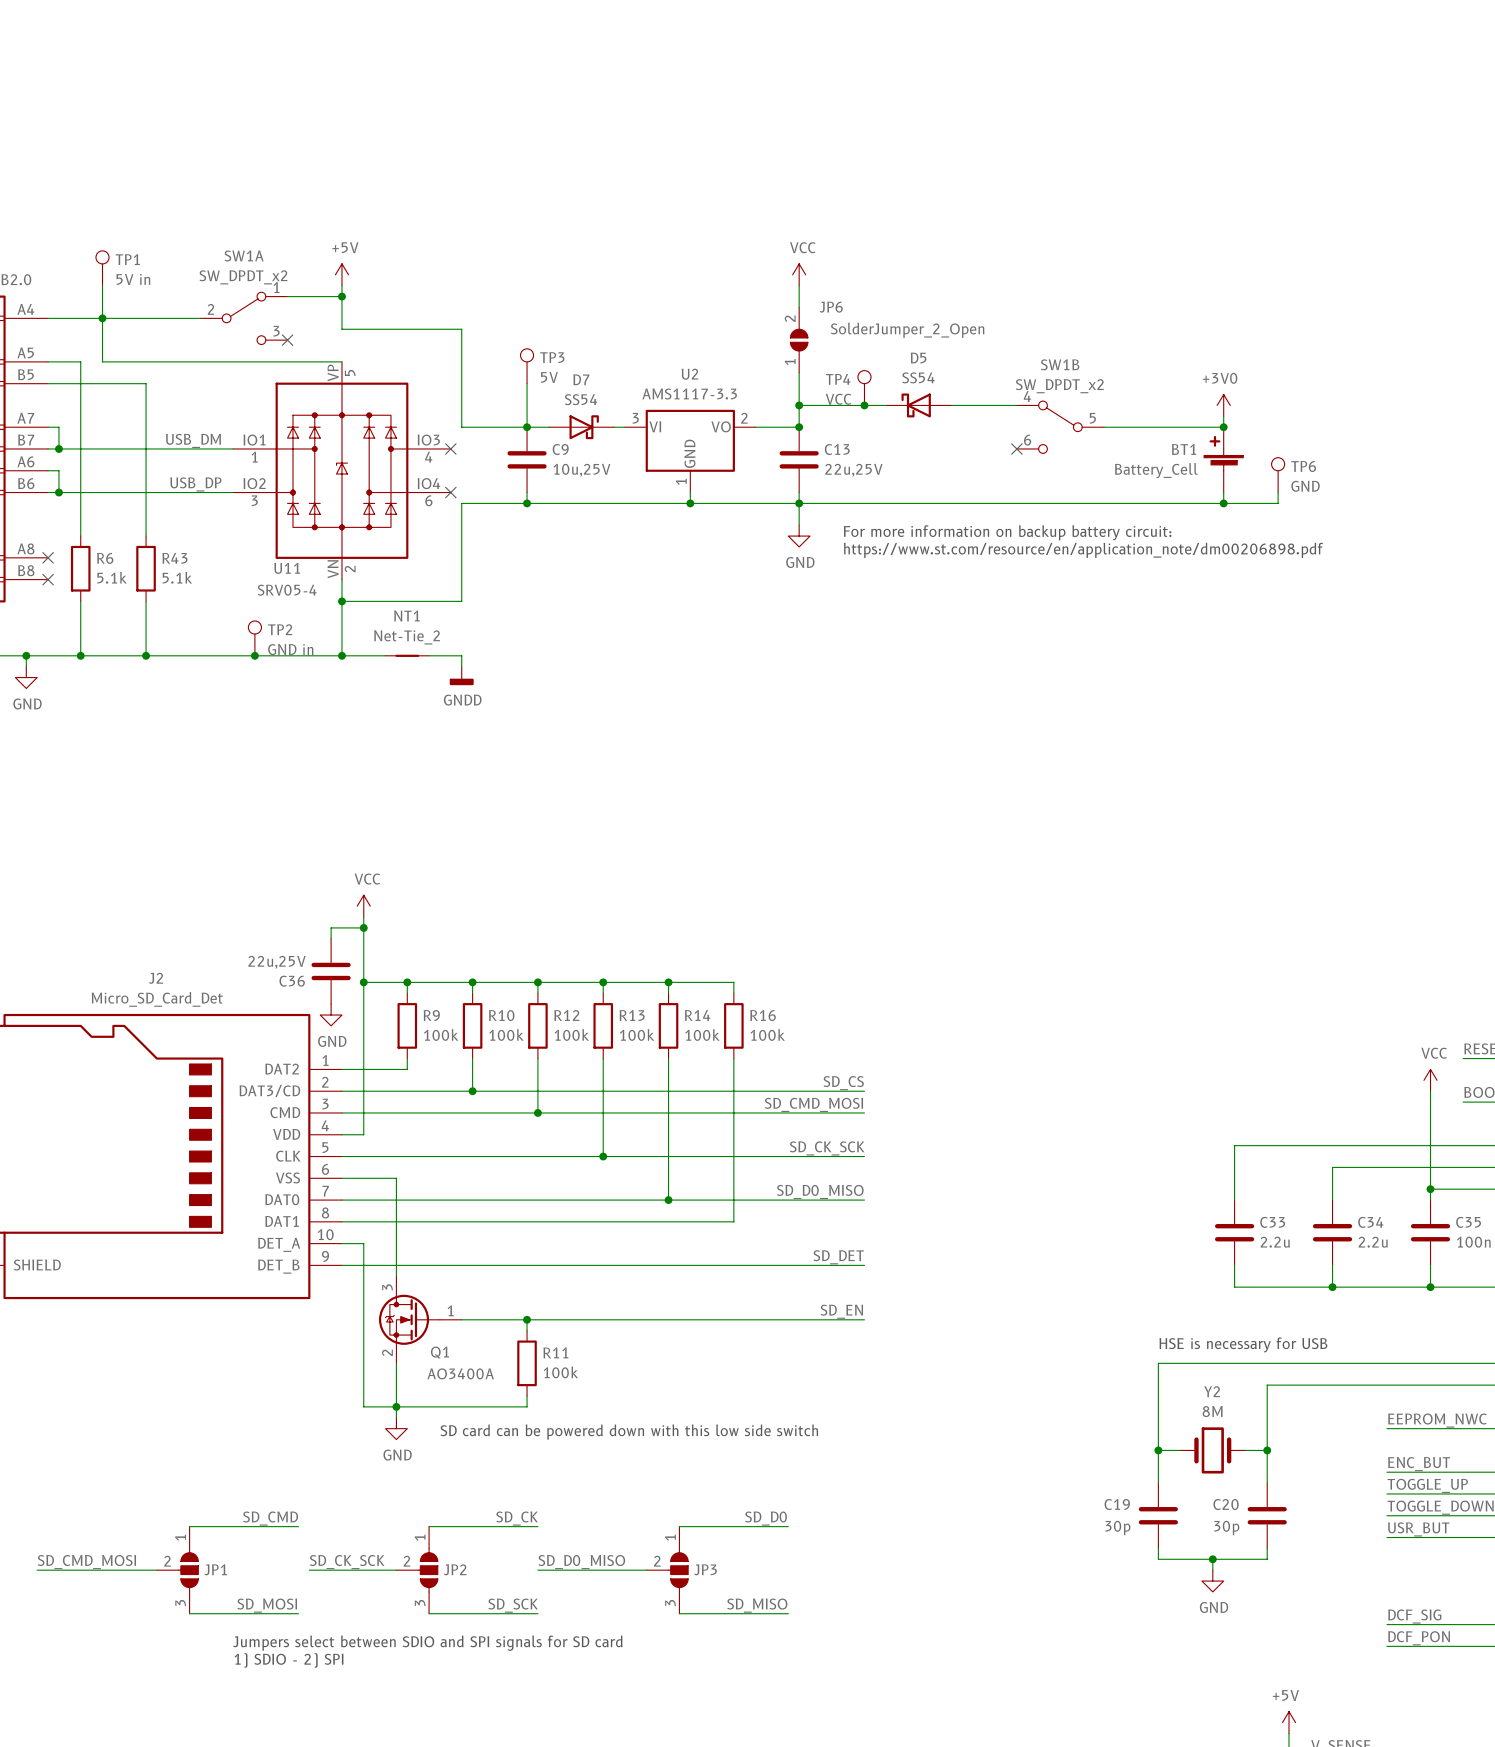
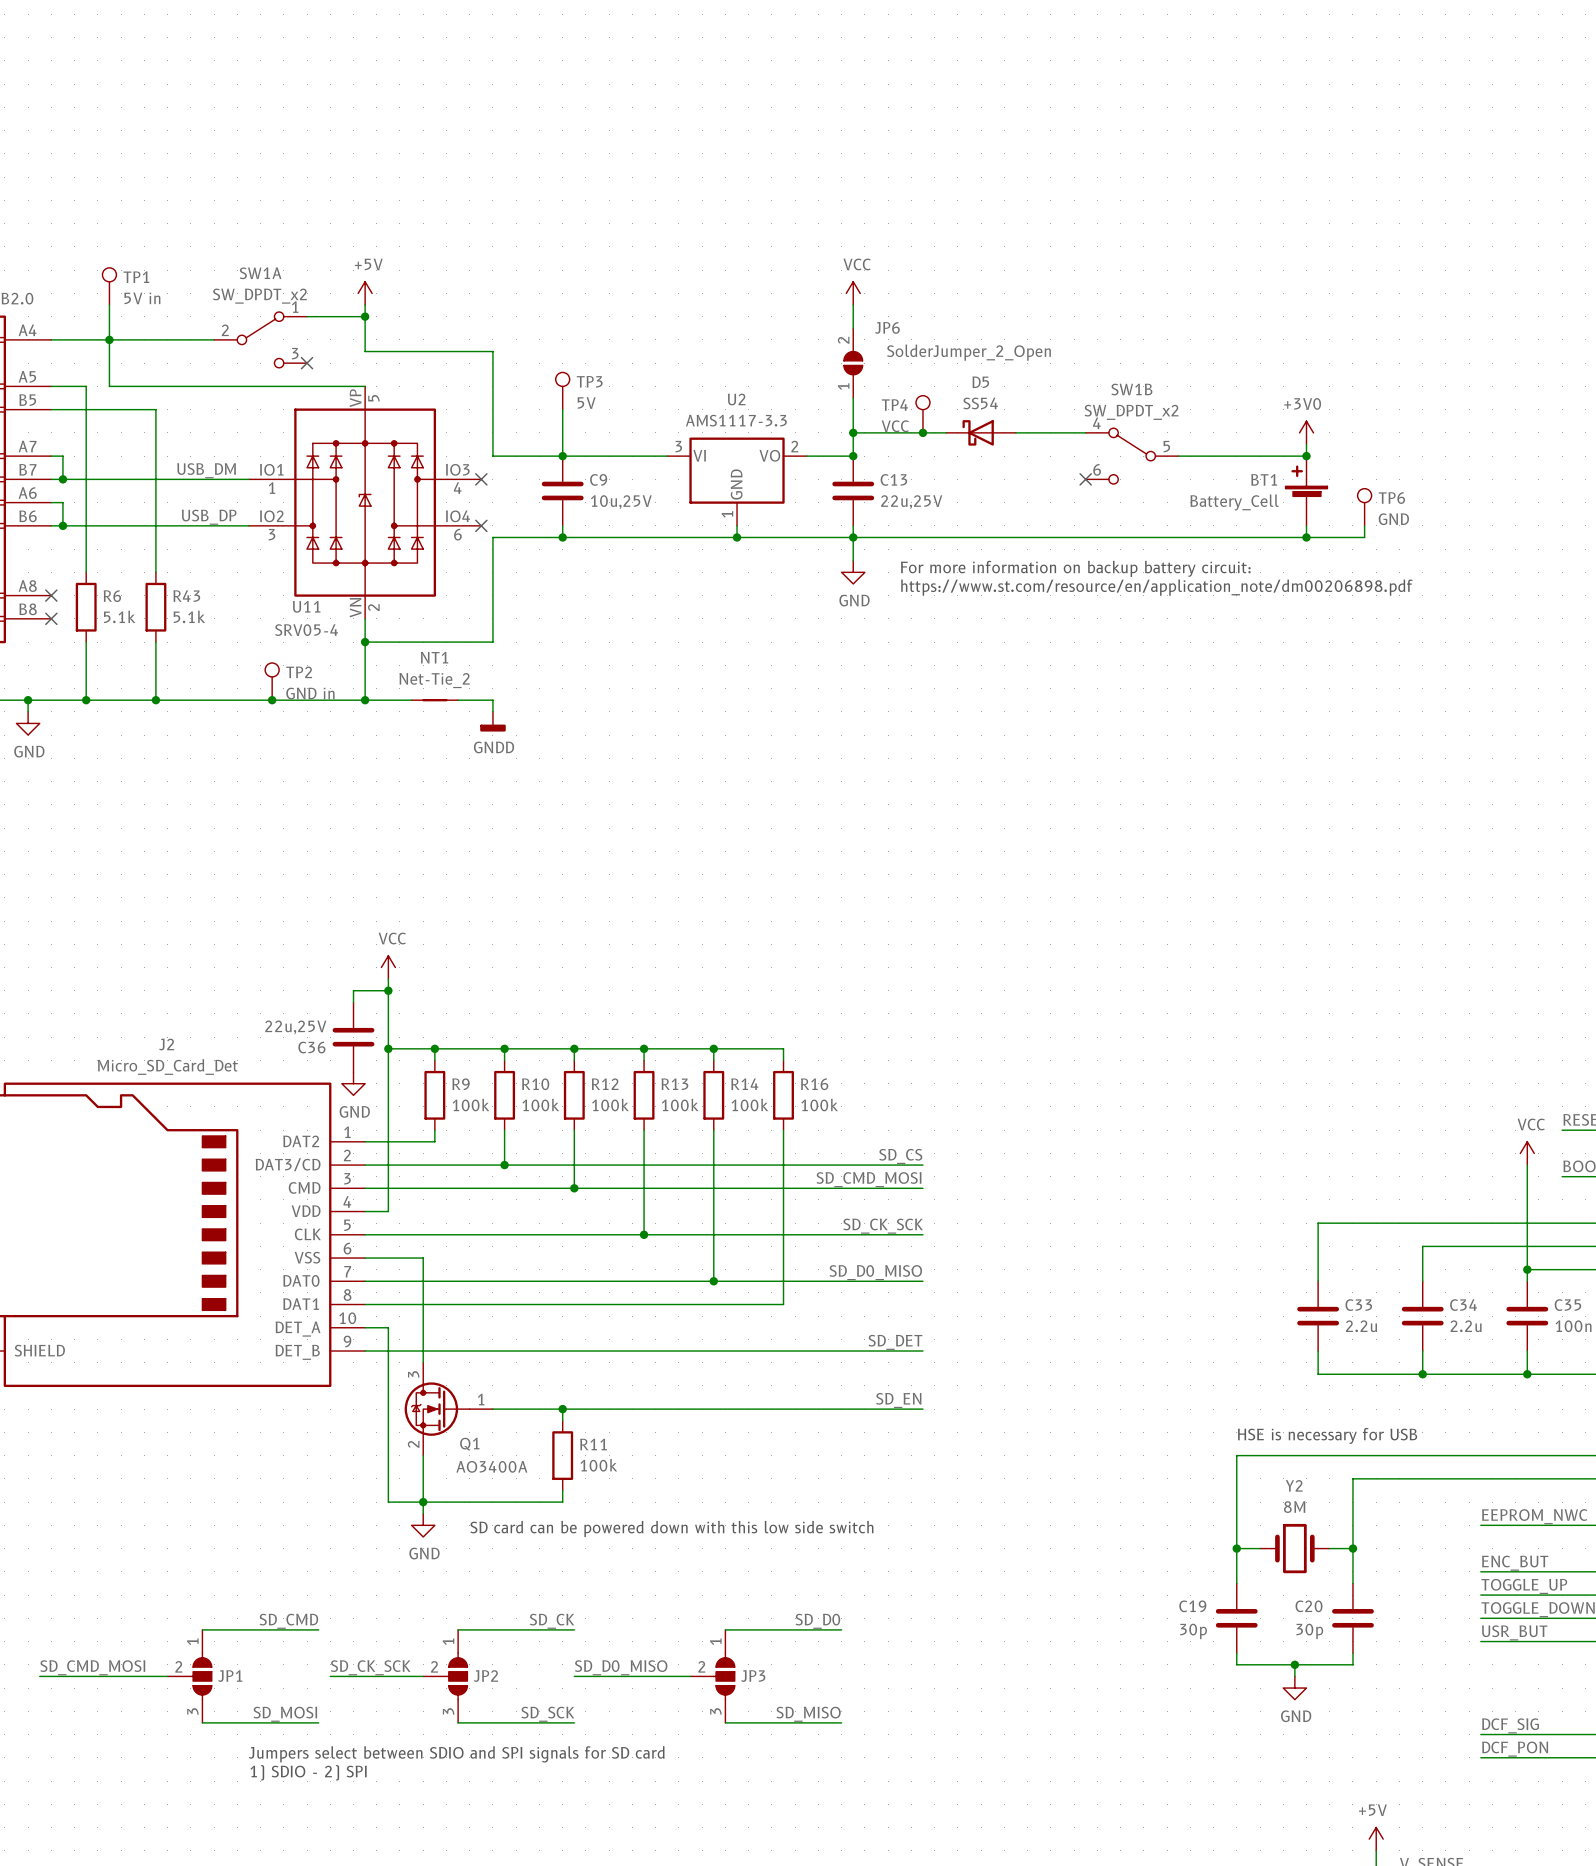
D7: SS54 (581, 427) -> none

